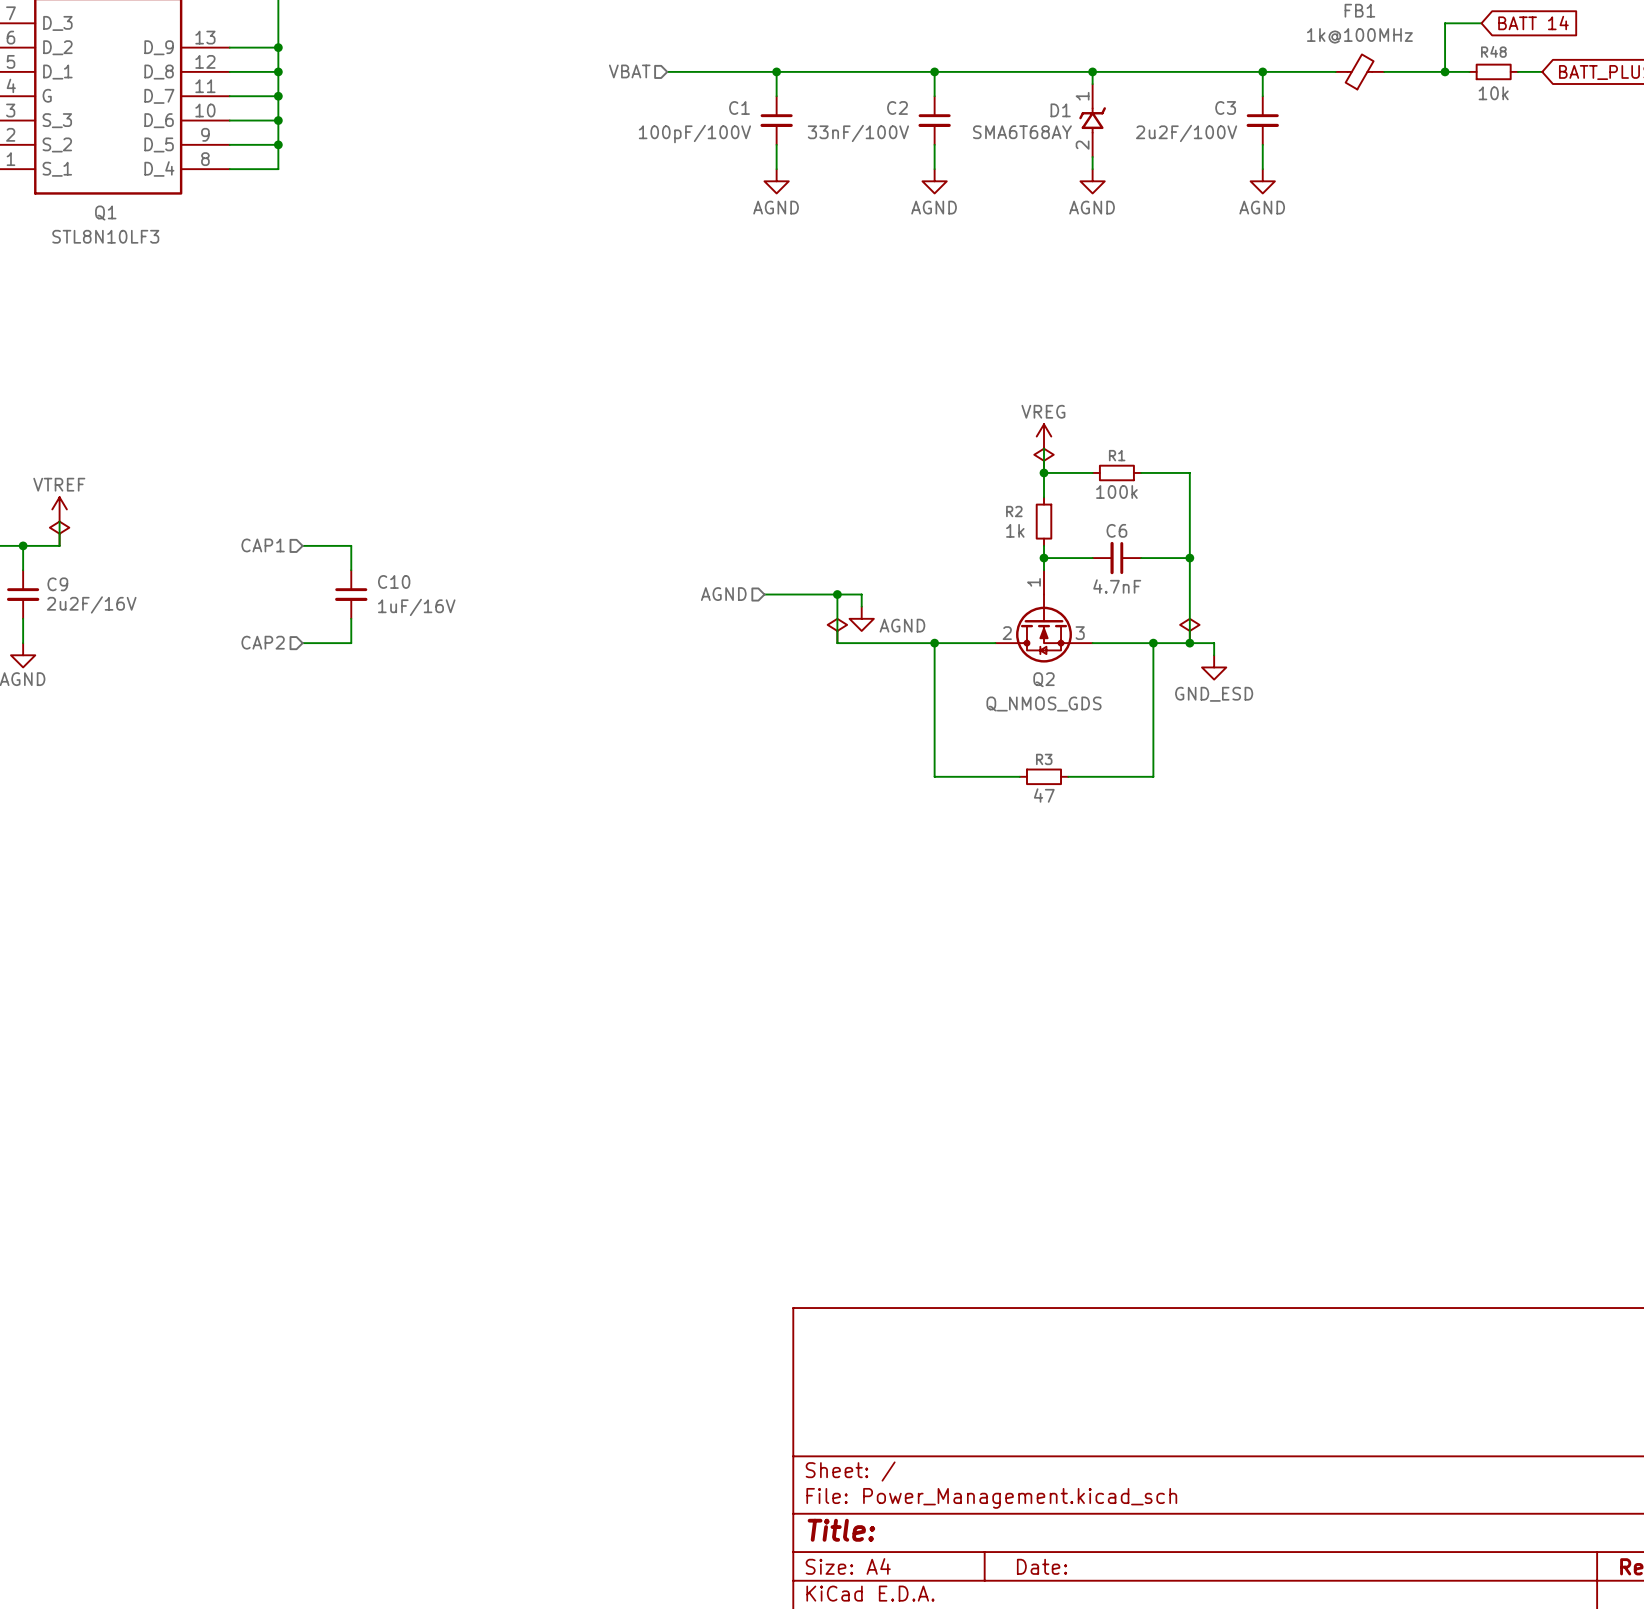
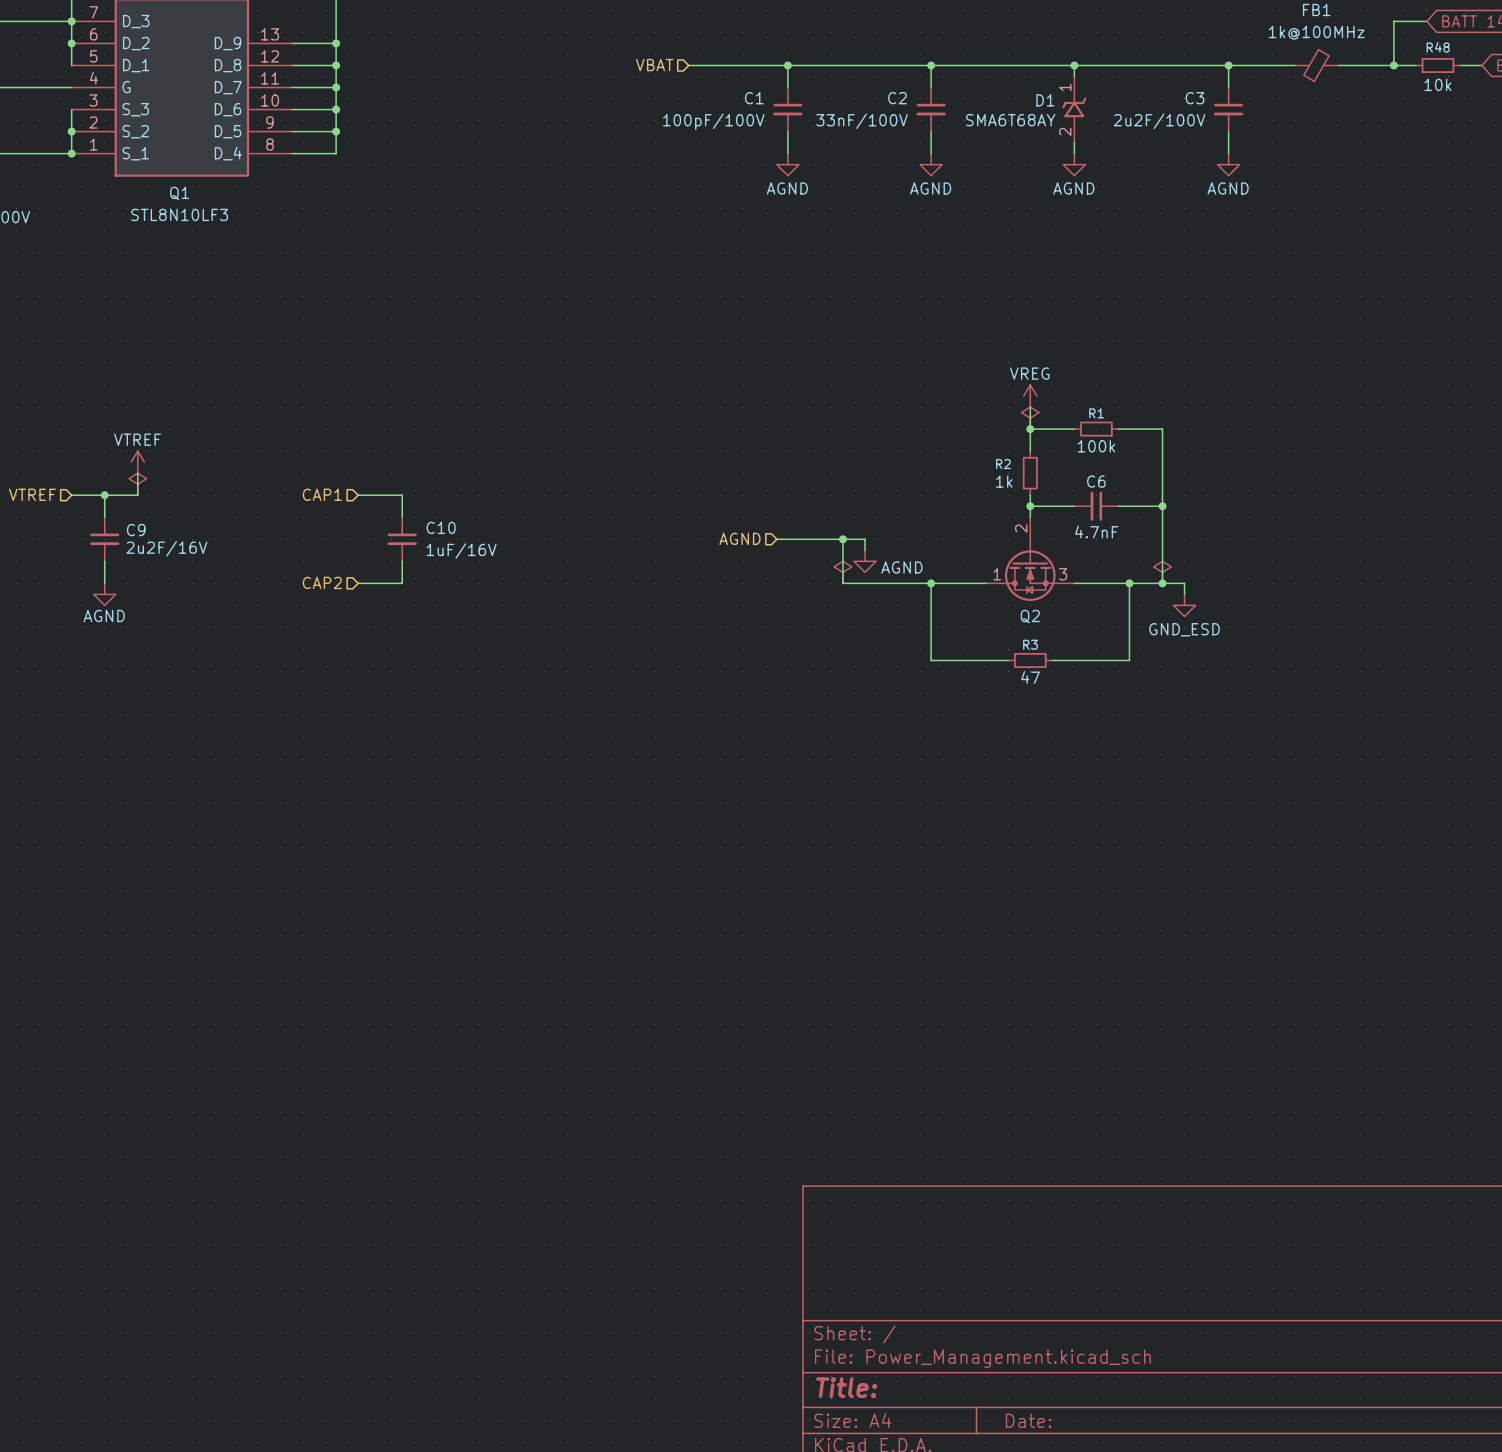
Q2 pin number: 1 (1033, 582) -> 2 (1021, 528)
Q2 pin number: 2 (1007, 633) -> 1 (997, 574)
Q2 value: Q_NMOS_GDS (1044, 704) -> none
wire: (934, 728) (934, 776) (1019, 776) -> (931, 660) (1008, 660)
wire: (1153, 728) (1153, 776) (1068, 776) -> (1129, 660) (1052, 660)
R3 position: (1044, 776) -> (1030, 660)

